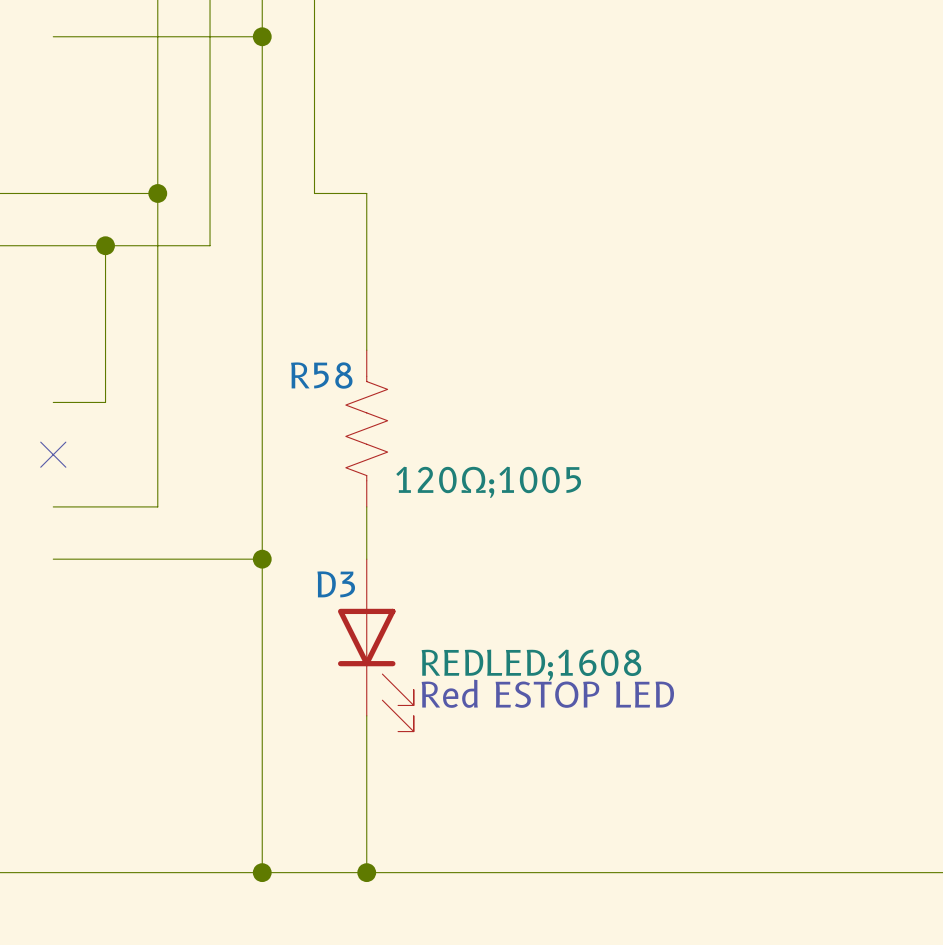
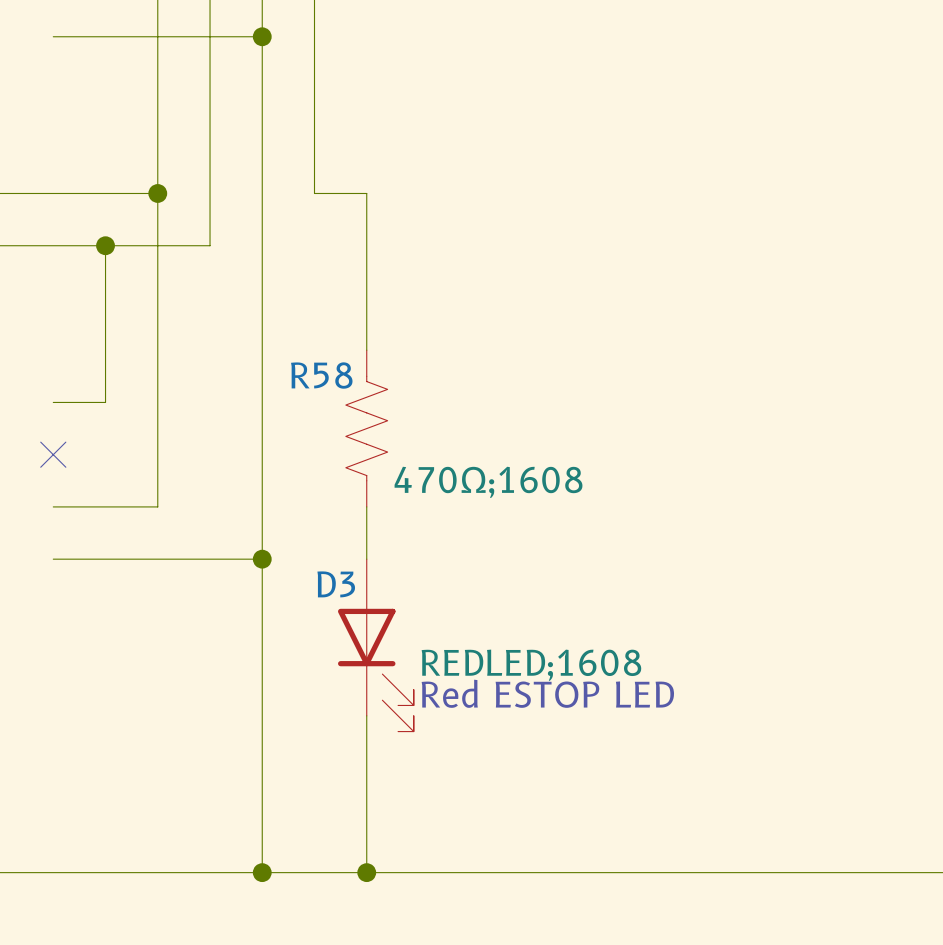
R58 value: 120Ω;1005 (488, 482) -> 470Ω;1608 (488, 482)

